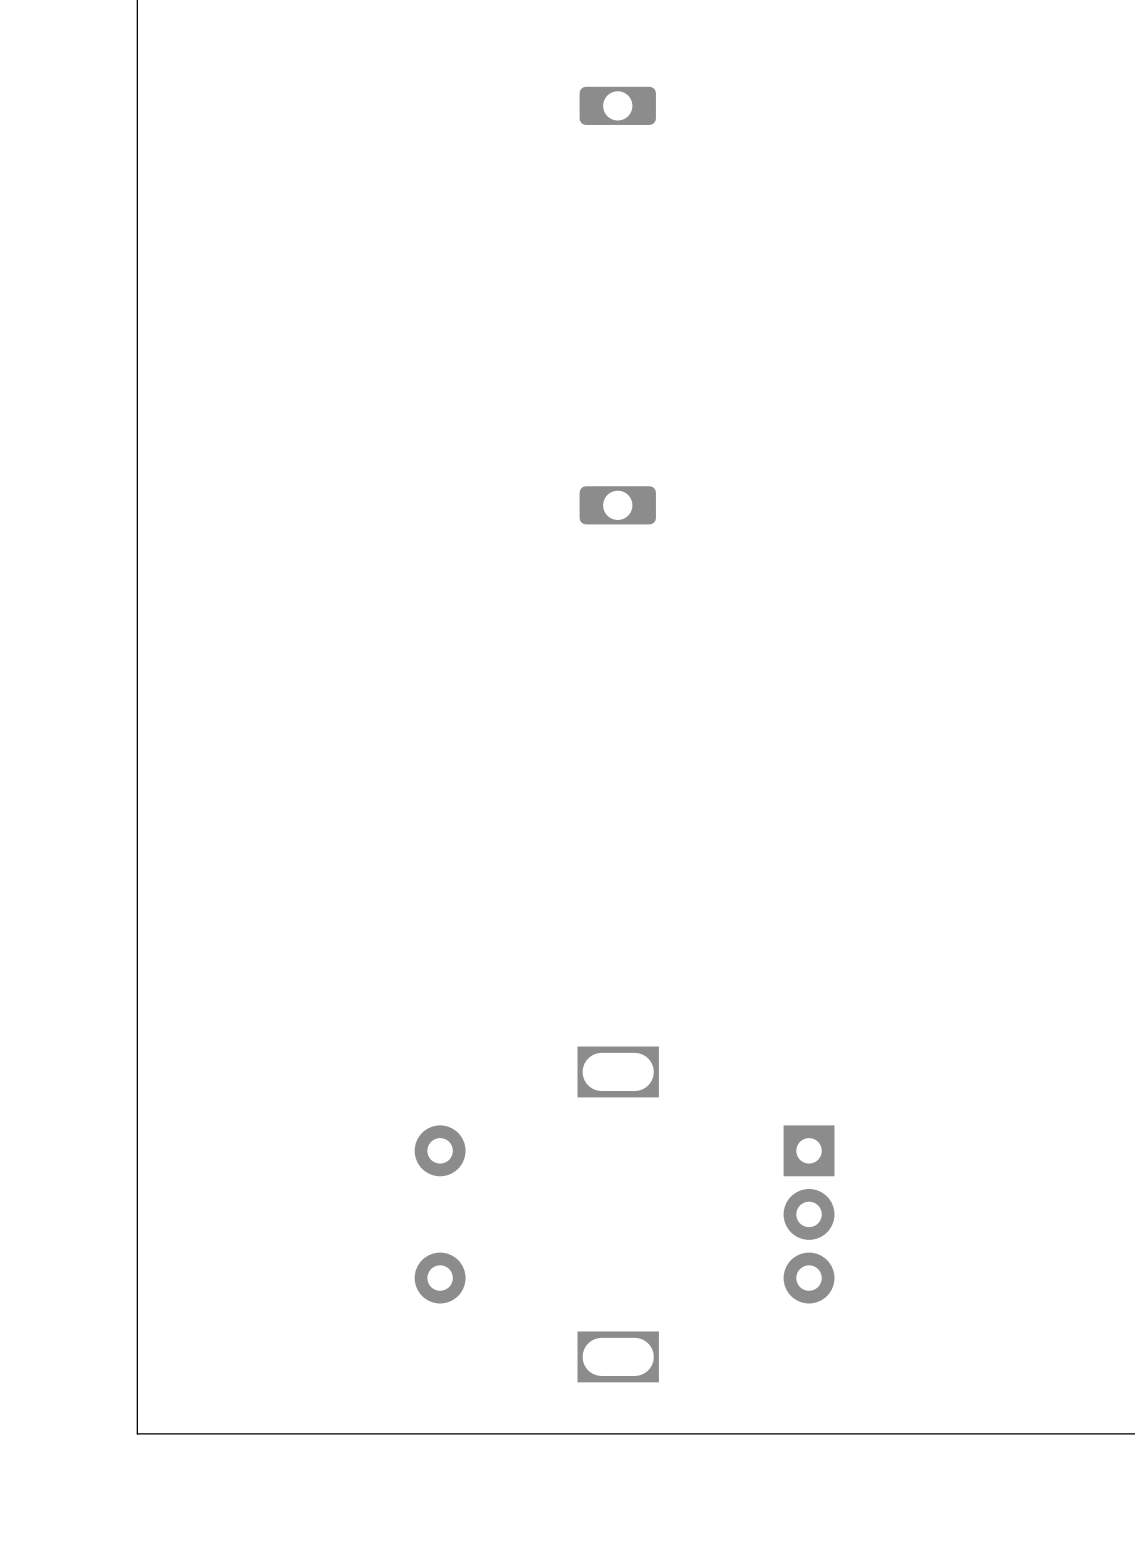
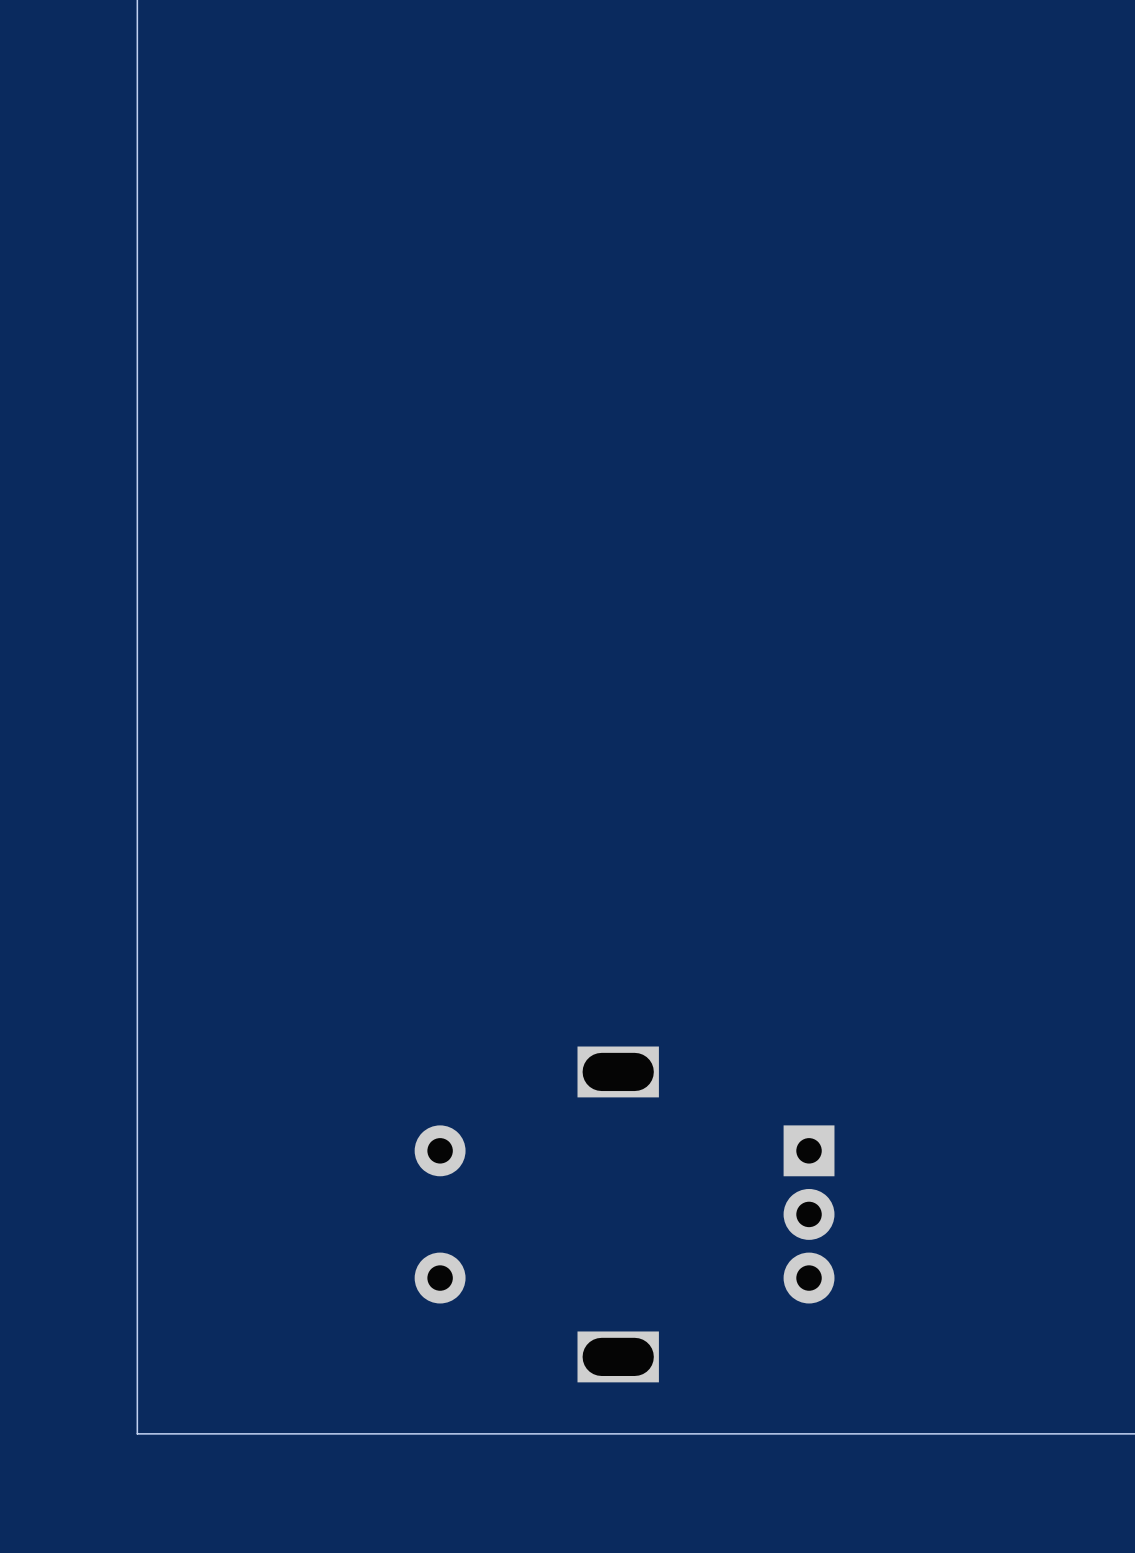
part: (617, 105) -> none
part: (617, 505) -> none

